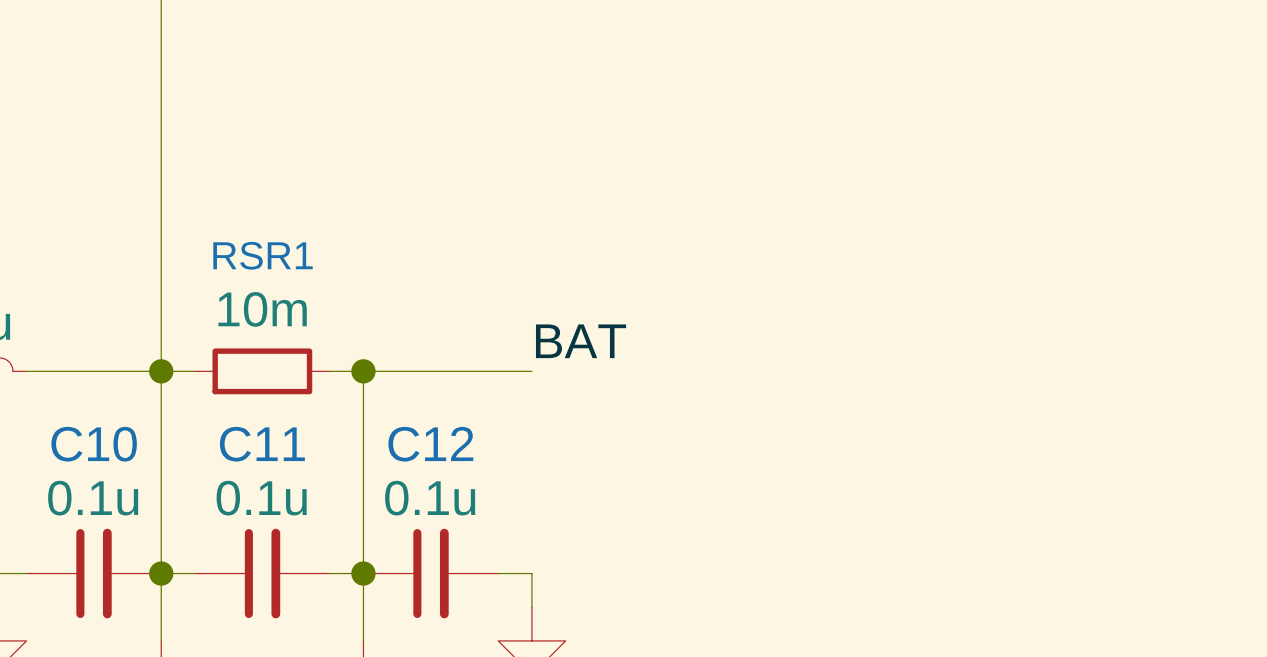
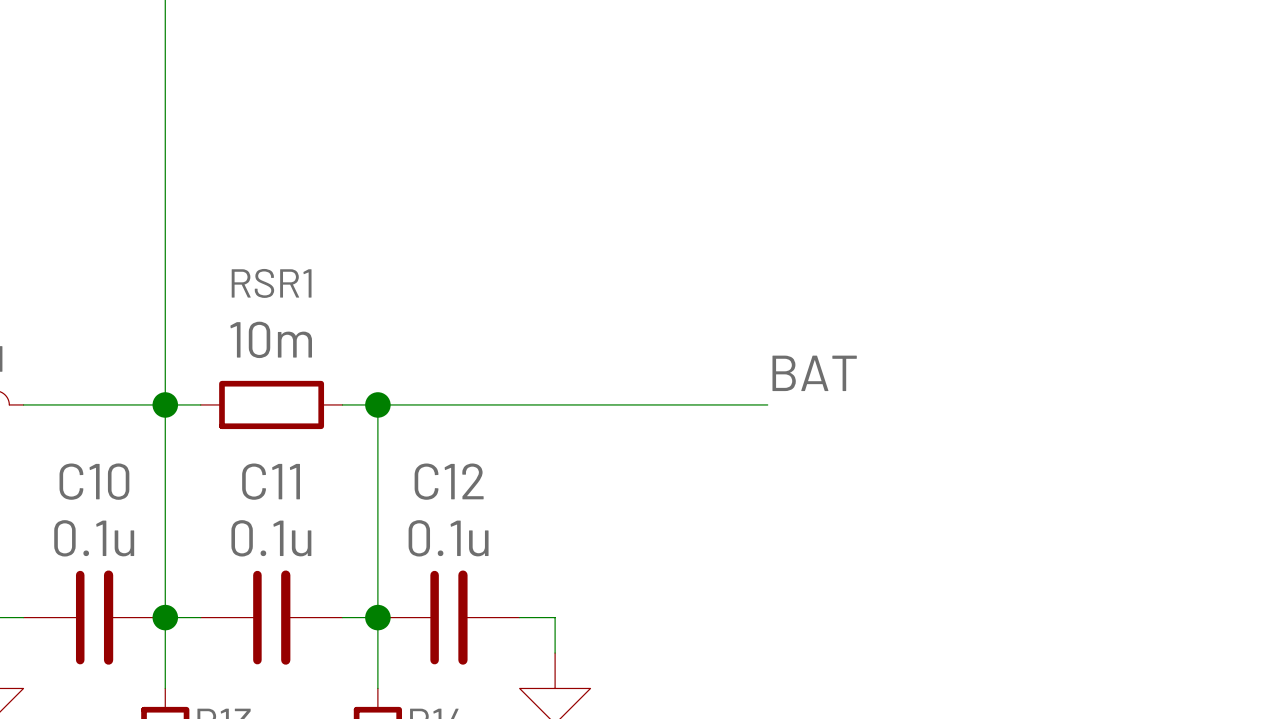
label position: BAT (581, 341) -> BAT (814, 373)
wire: none -> (555, 404) (767, 404)

